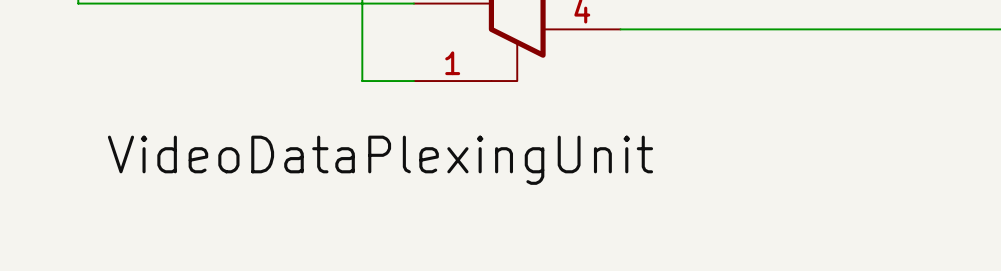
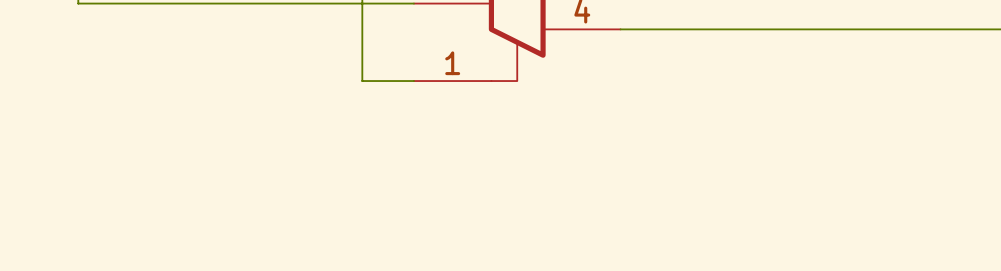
label: VideoDataPlexingUnit (380, 160) -> none

